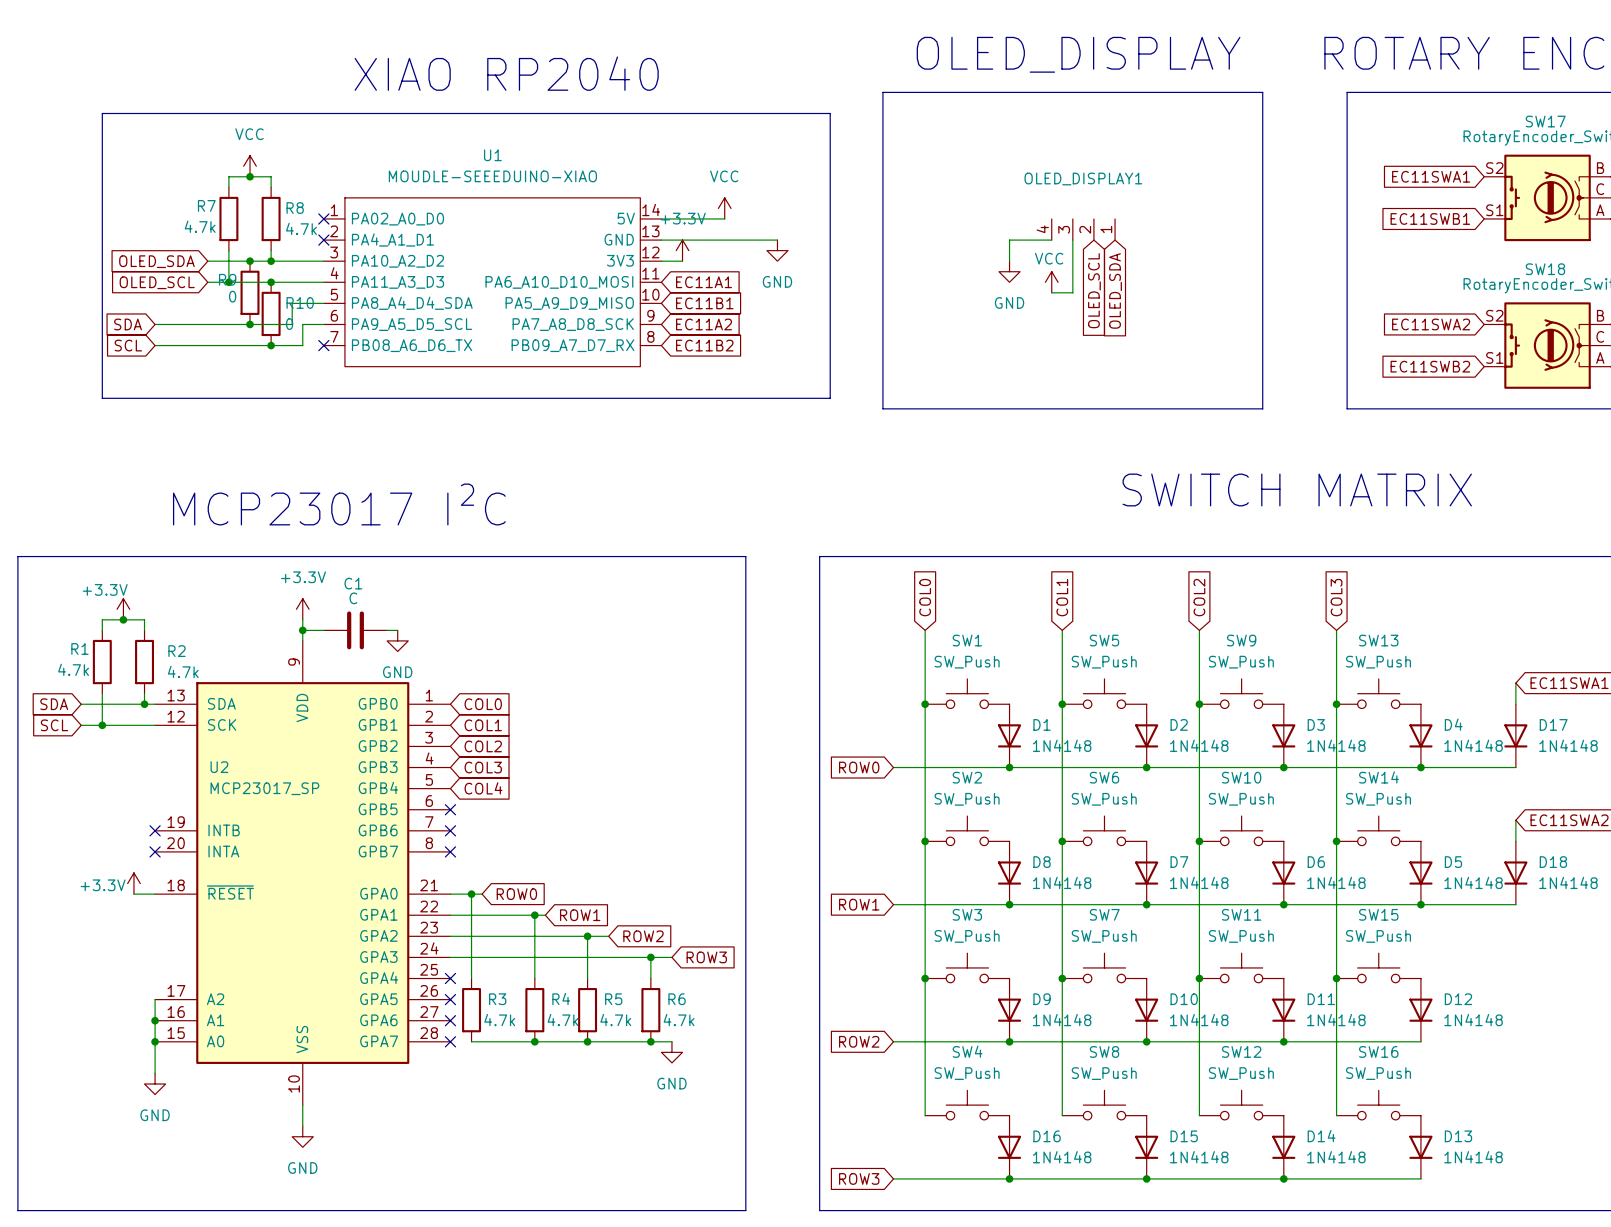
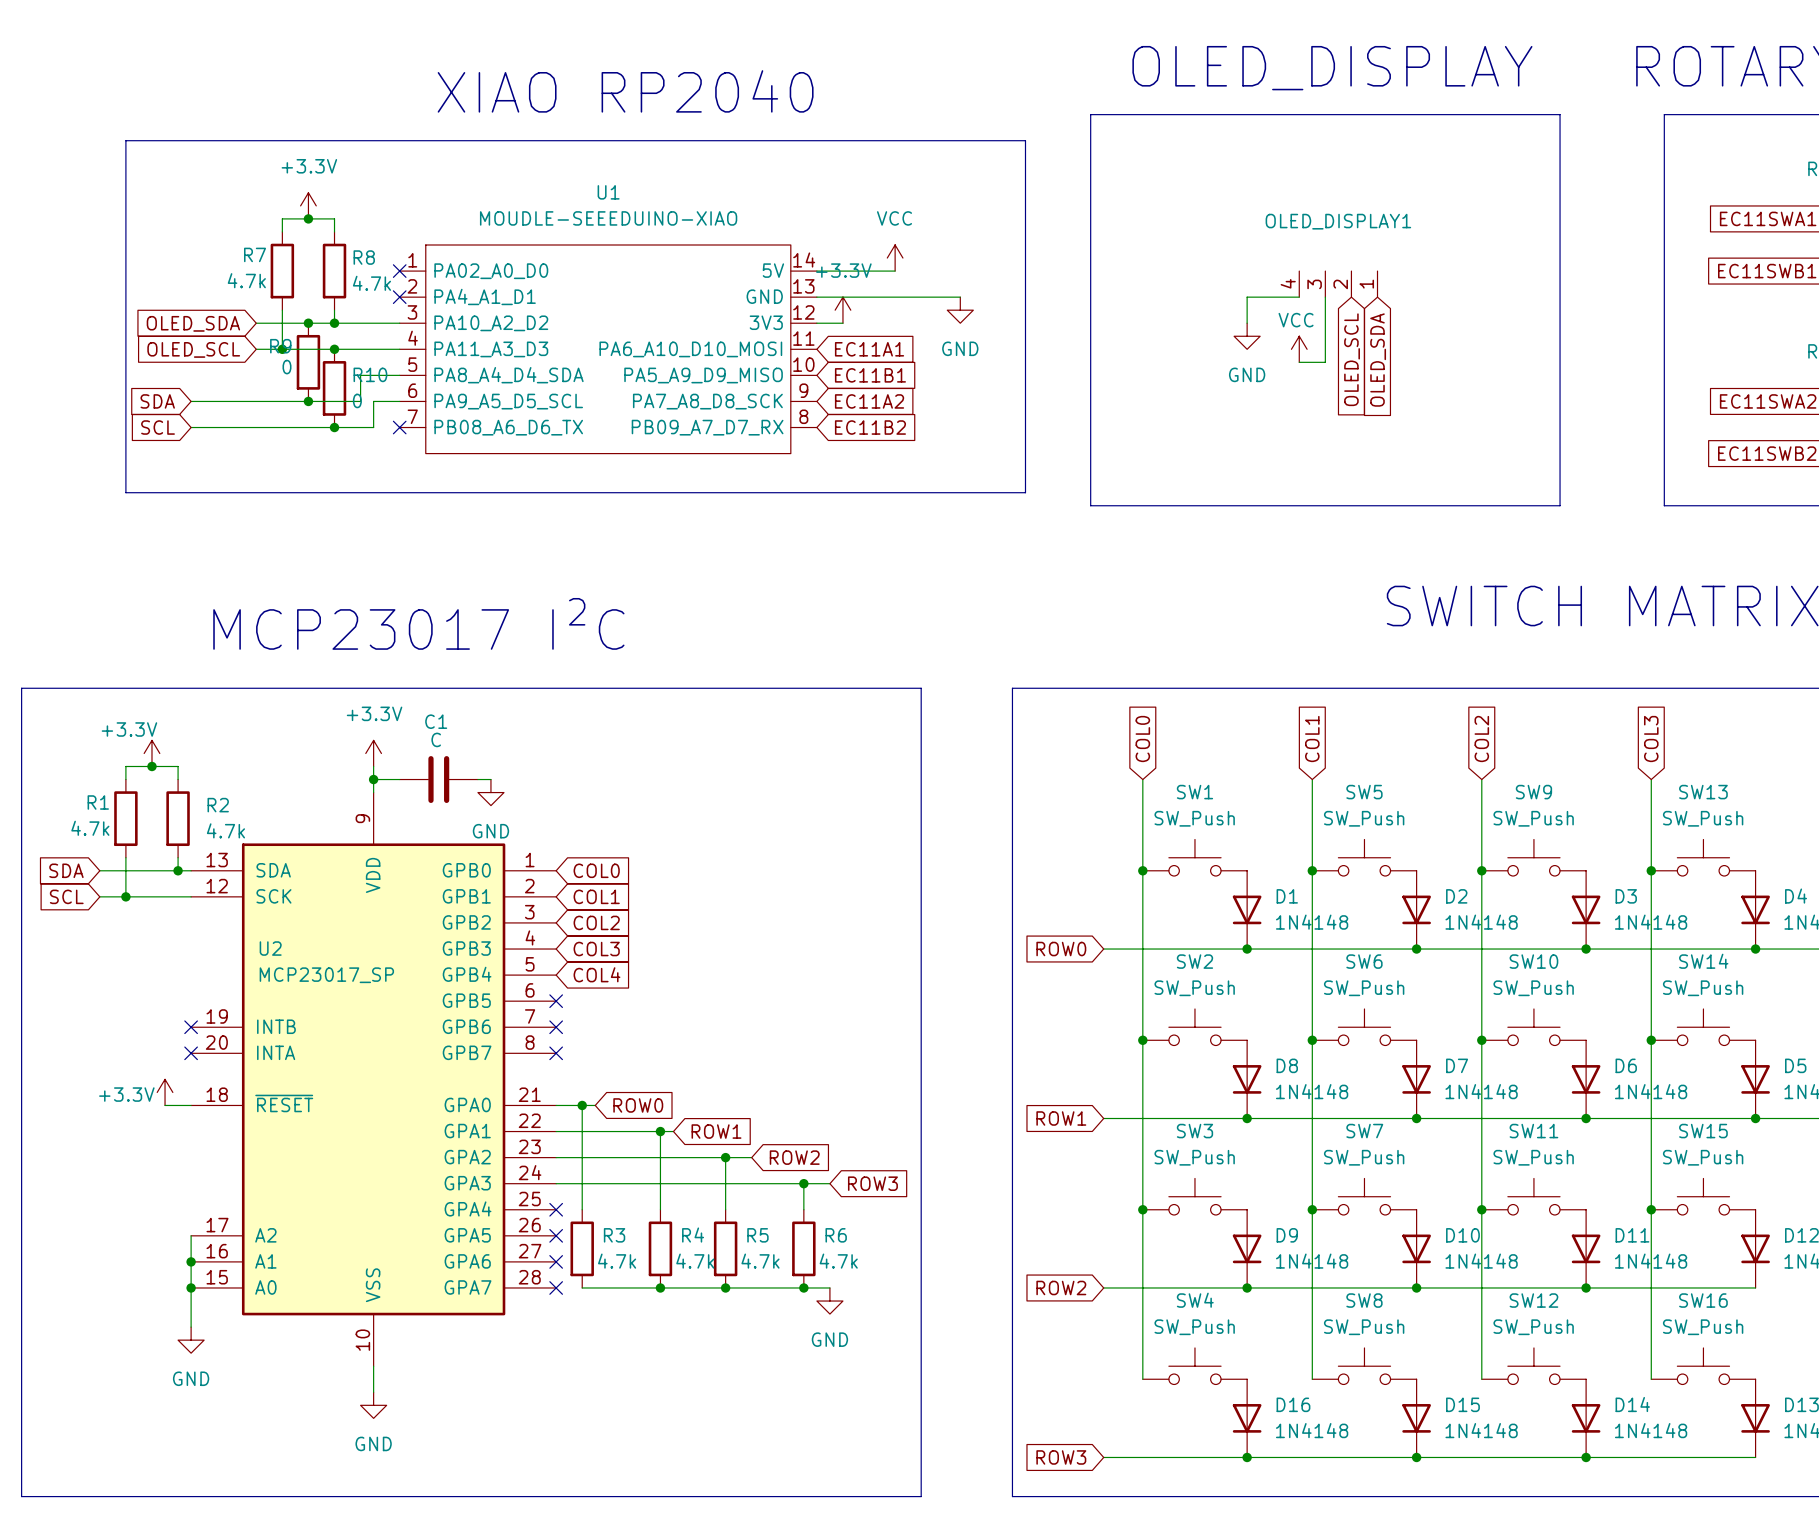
power symbol: VCC (250, 166) -> +3.3V (308, 205)

